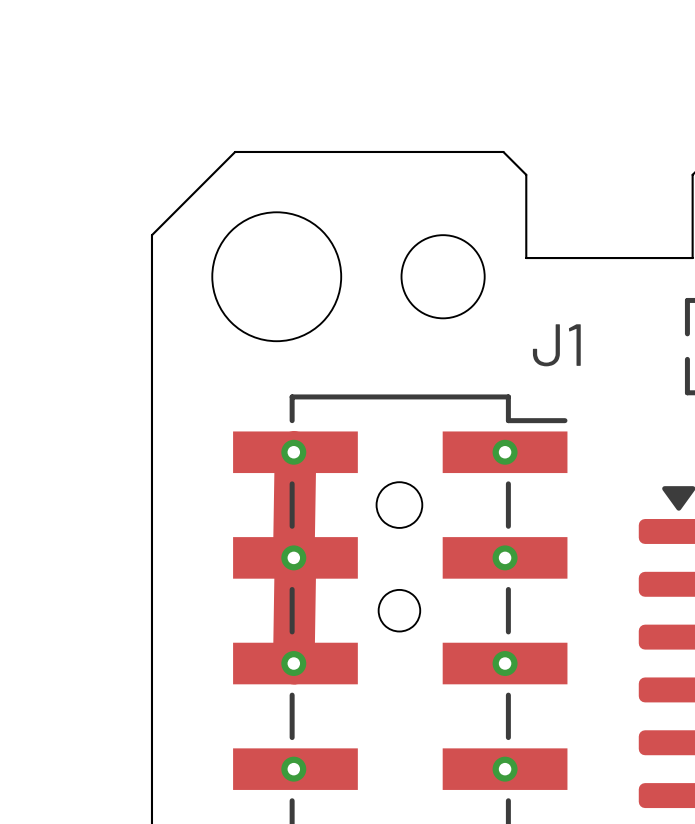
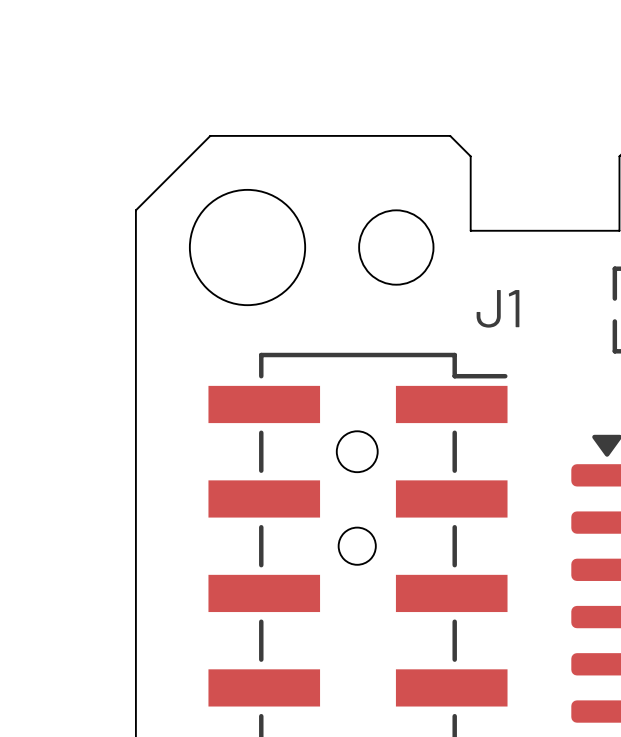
track: (240, 452) (295, 452) (293, 452) (295, 453) (293, 663) (295, 663) -> none
via: (293, 452) -> none
via: (505, 452) -> none
via: (293, 557) -> none
via: (505, 557) -> none
via: (293, 663) -> none
via: (505, 663) -> none
via: (293, 769) -> none
via: (505, 769) -> none

